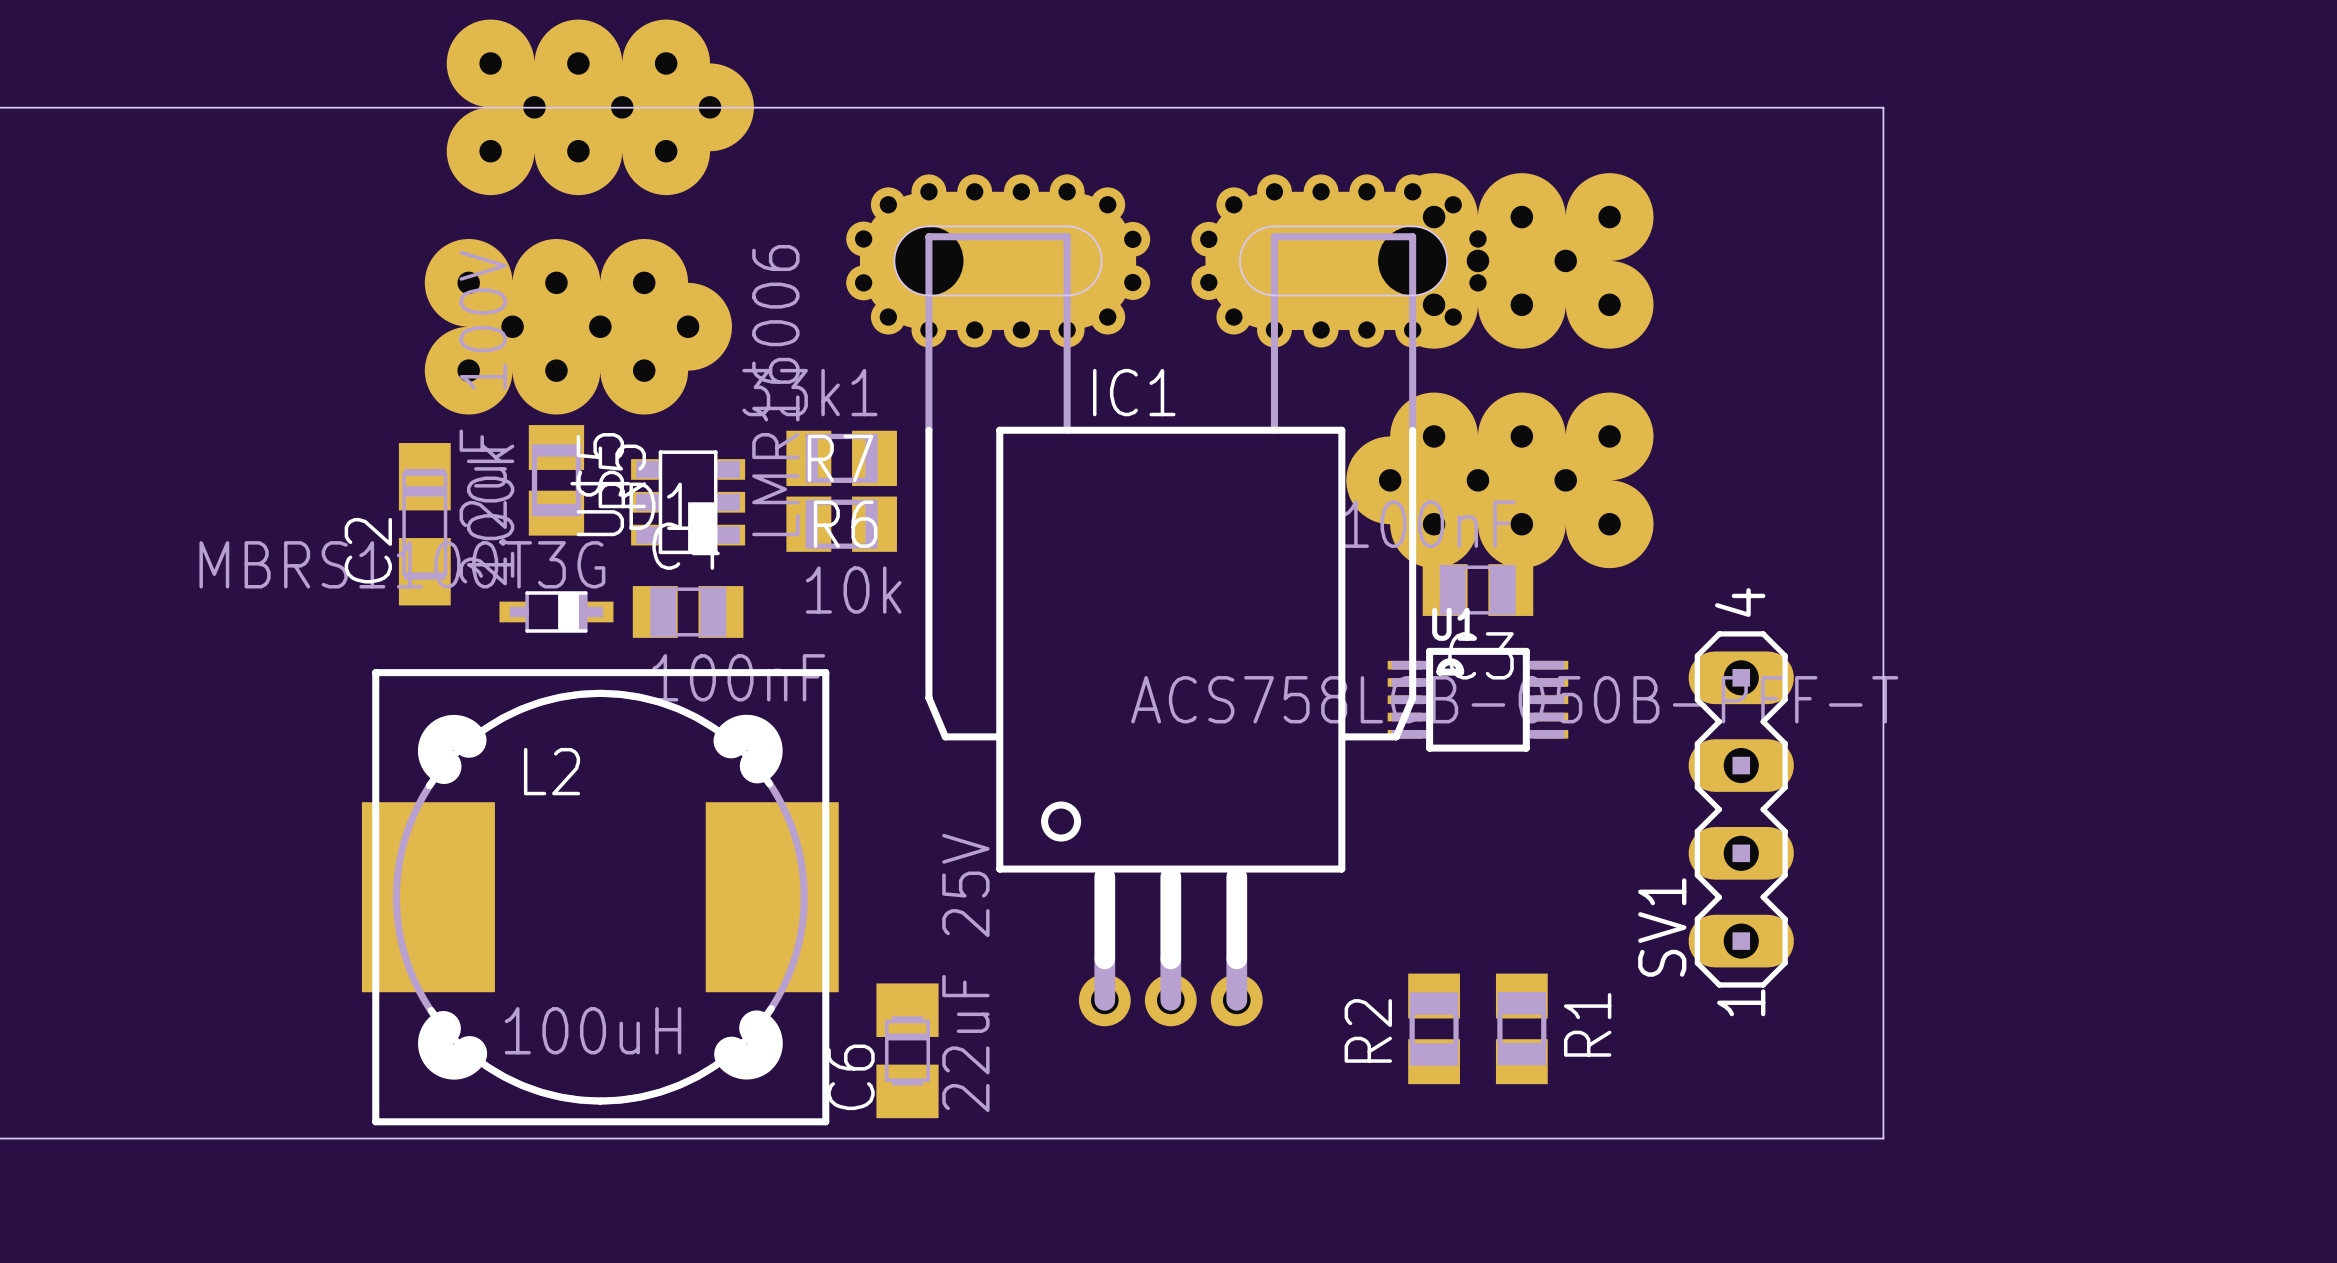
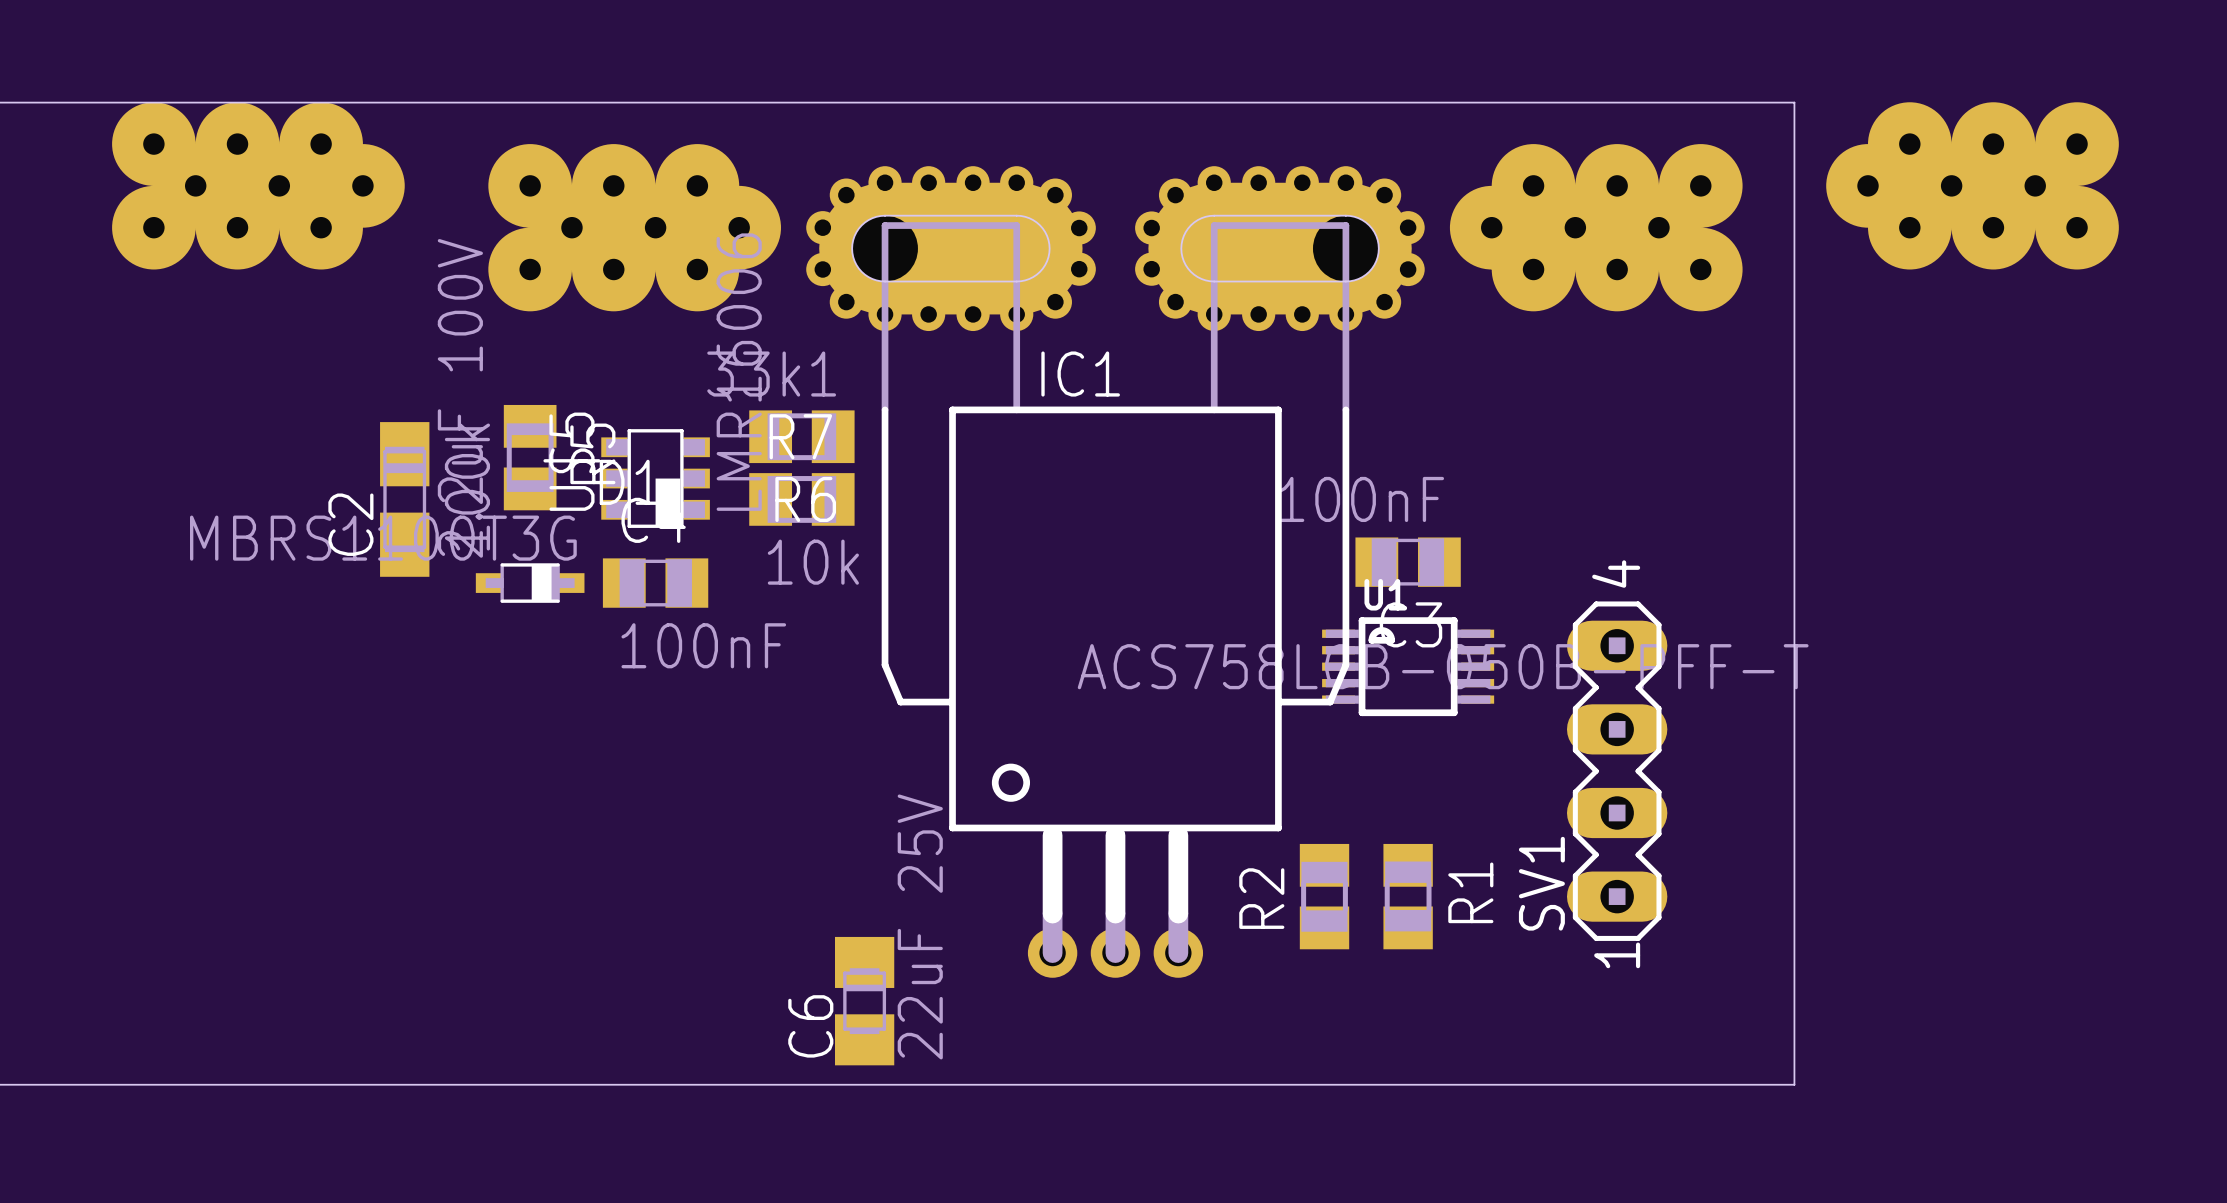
part: (600, 107) -> none
part: none -> (258, 185)
part: none -> (1972, 185)
part: none -> (634, 227)
part: none -> (1596, 227)
part: (1499, 260) -> none
part: (578, 326) -> none
part: (1499, 480) -> none
SV1 position: (1741, 809) -> (1617, 771)
L2: 100uH (600, 897) -> none
R2 position: (1434, 1028) -> (1324, 896)
R1 position: (1521, 1028) -> (1408, 896)

